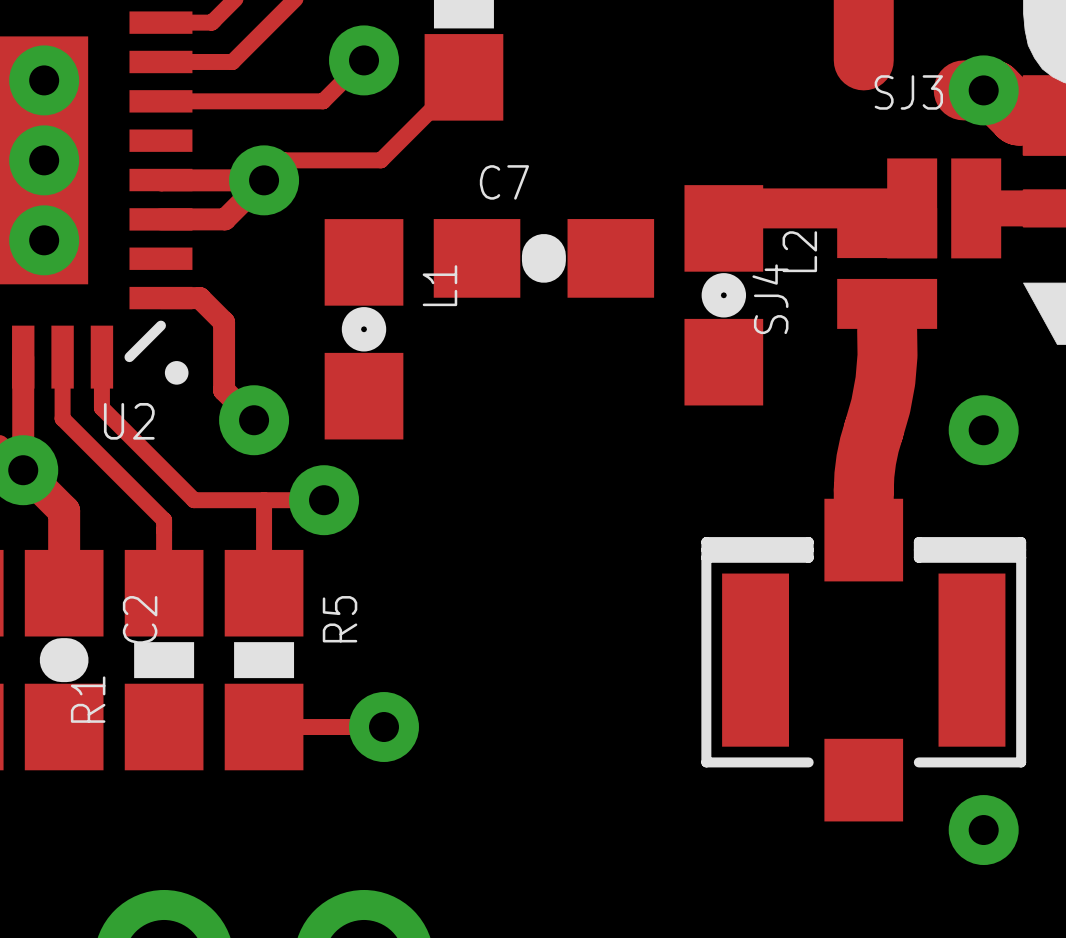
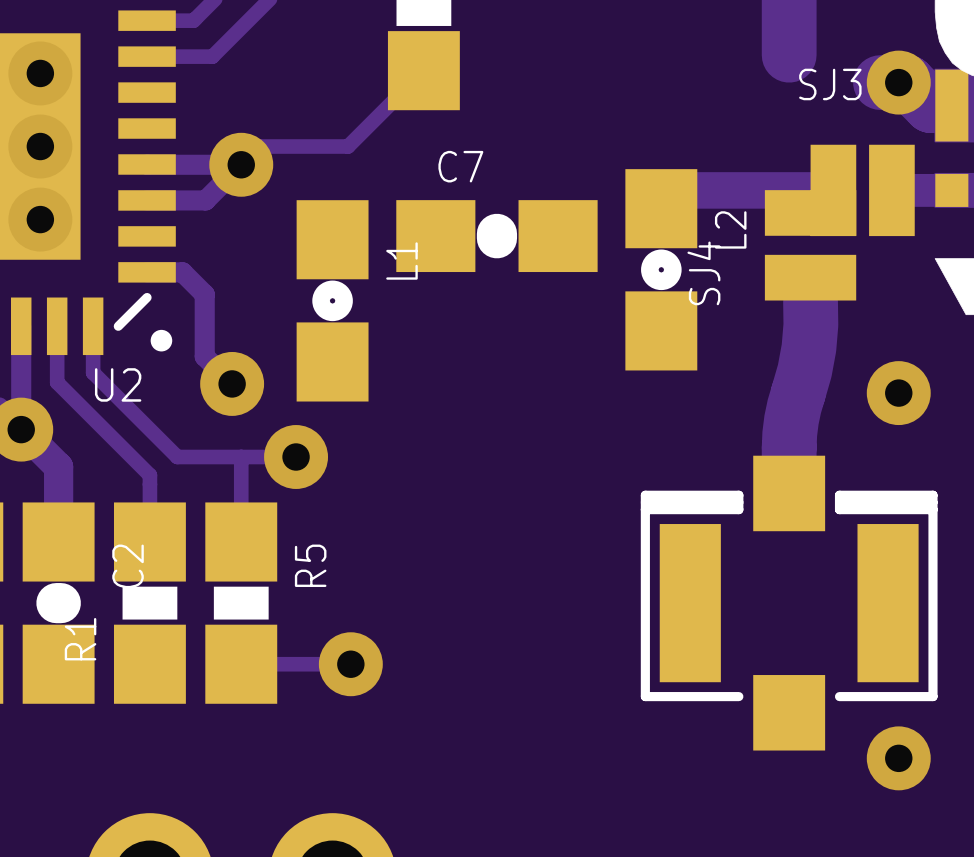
track: (364, 60) (323, 101) (160, 101) -> none
via: (364, 60) -> none

